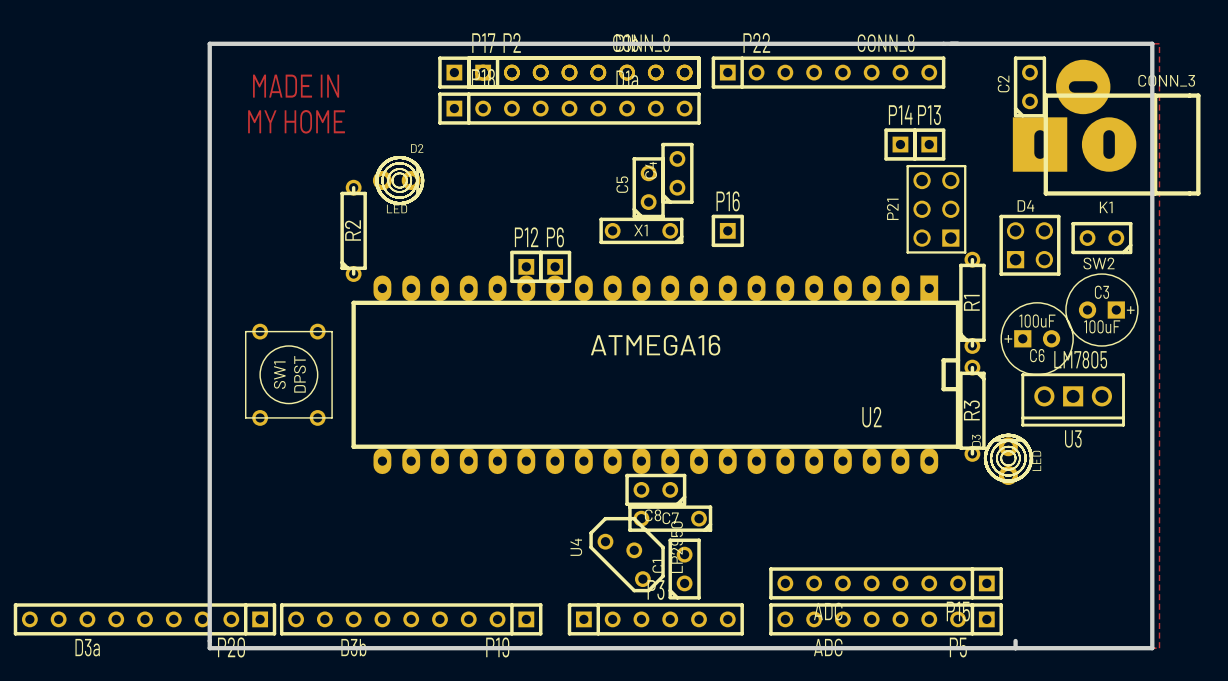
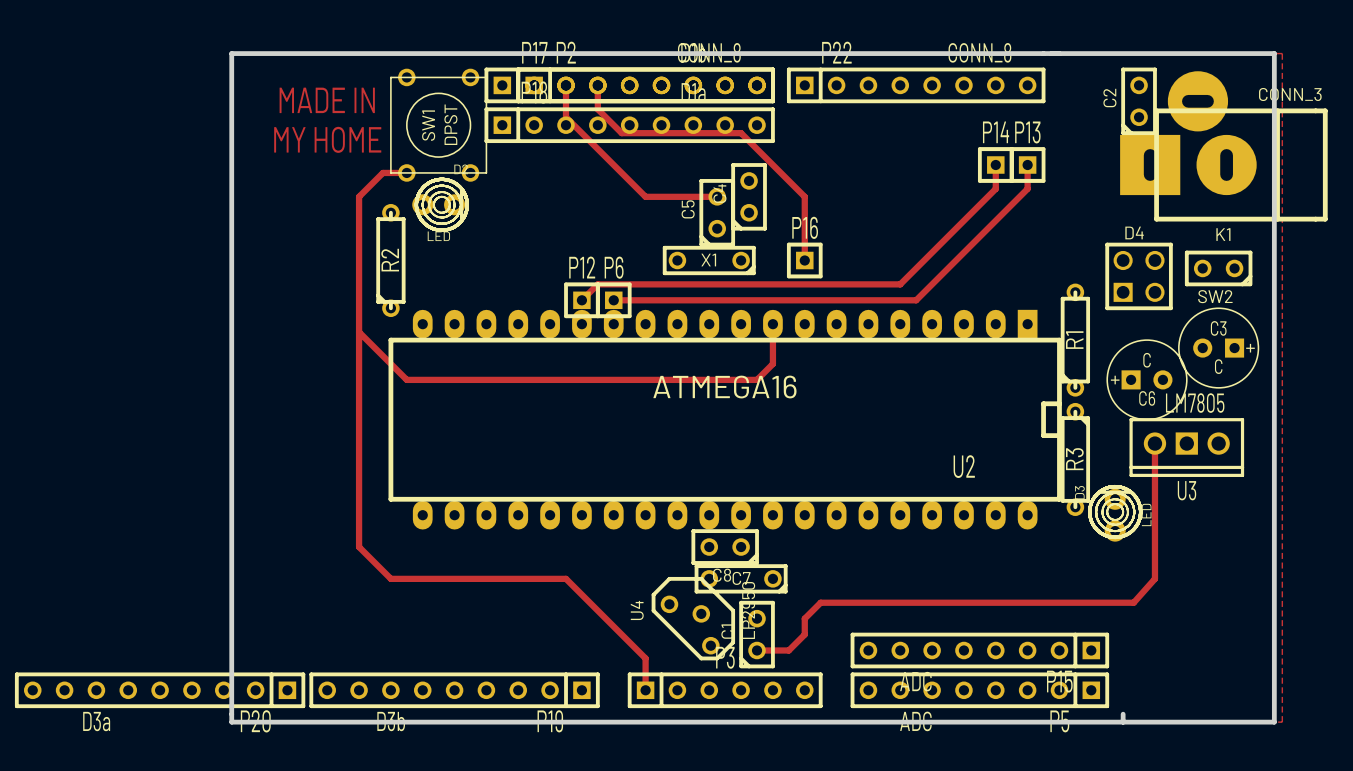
track: none -> (566, 85) (566, 117) (645, 196) (717, 196)
track: none -> (597, 85) (597, 109) (621, 133) (741, 133) (804, 196) (804, 260)
track: none -> (995, 165) (995, 188) (900, 284) (597, 284) (581, 300)
track: none -> (1027, 165) (1027, 188) (916, 300) (613, 300)
track: none -> (406, 172) (382, 172) (359, 196) (359, 547) (390, 578) (566, 578) (645, 658) (645, 690)
P21: (936, 209) -> none
track: none -> (772, 324) (772, 363) (757, 379) (406, 379) (359, 332)
C6 value: 100uF (1037, 321) -> C (1147, 360)
C3 value: 100uF (1102, 326) -> C (1218, 366)
SW1 position: (288, 374) -> (438, 125)
track: none -> (1154, 443) (1154, 578) (1133, 602) (820, 602) (804, 618) (804, 634) (788, 650) (757, 650)

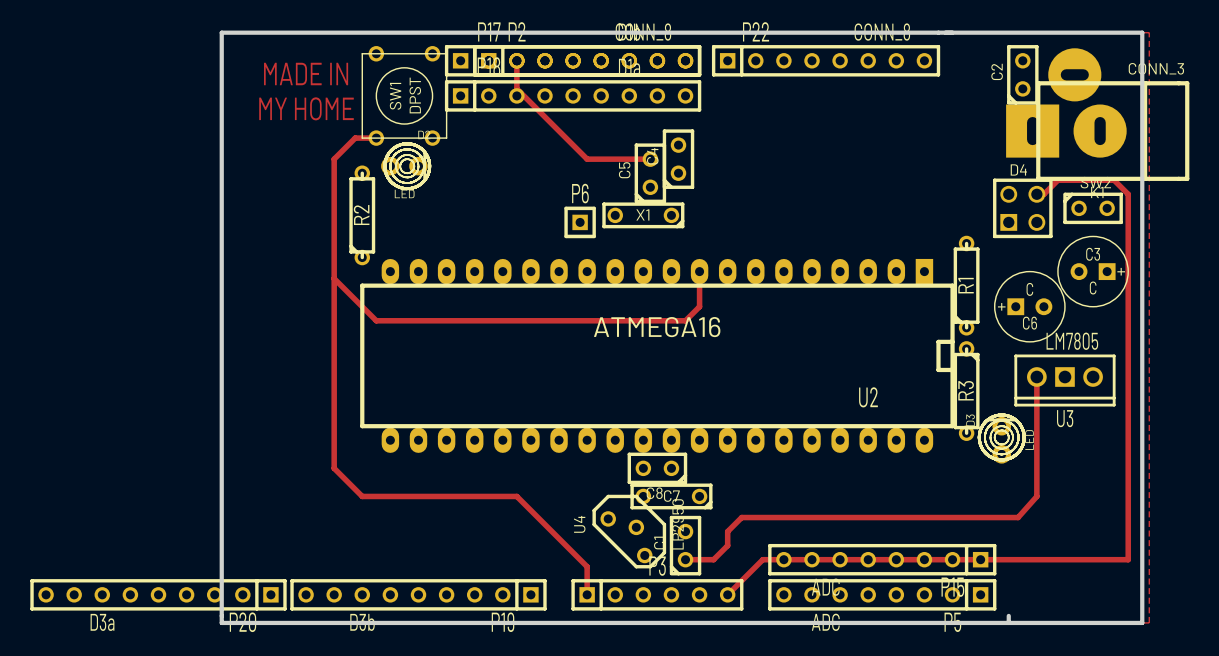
track: (597, 85) (597, 109) (621, 133) (741, 133) (804, 196) (804, 260) -> none
track: (995, 165) (995, 188) (900, 284) (597, 284) (581, 300) -> none
P14: (995, 165) -> none
track: (1027, 165) (1027, 188) (916, 300) (613, 300) -> none
P13: (1027, 165) -> none
track: none -> (1036, 194) (1043, 194) (1057, 180) (1114, 180) (1128, 194) (1128, 559) (762, 559) (727, 594)
P16: (804, 260) -> none
SW2 rotation: 0° (1218, 268) -> 180° (1093, 208)
D4 position: (1139, 276) -> (1022, 208)
P12: (581, 300) -> none
P6 position: (613, 300) -> (580, 222)
C3 position: (1218, 348) -> (1093, 271)
C6 position: (1147, 379) -> (1029, 306)

